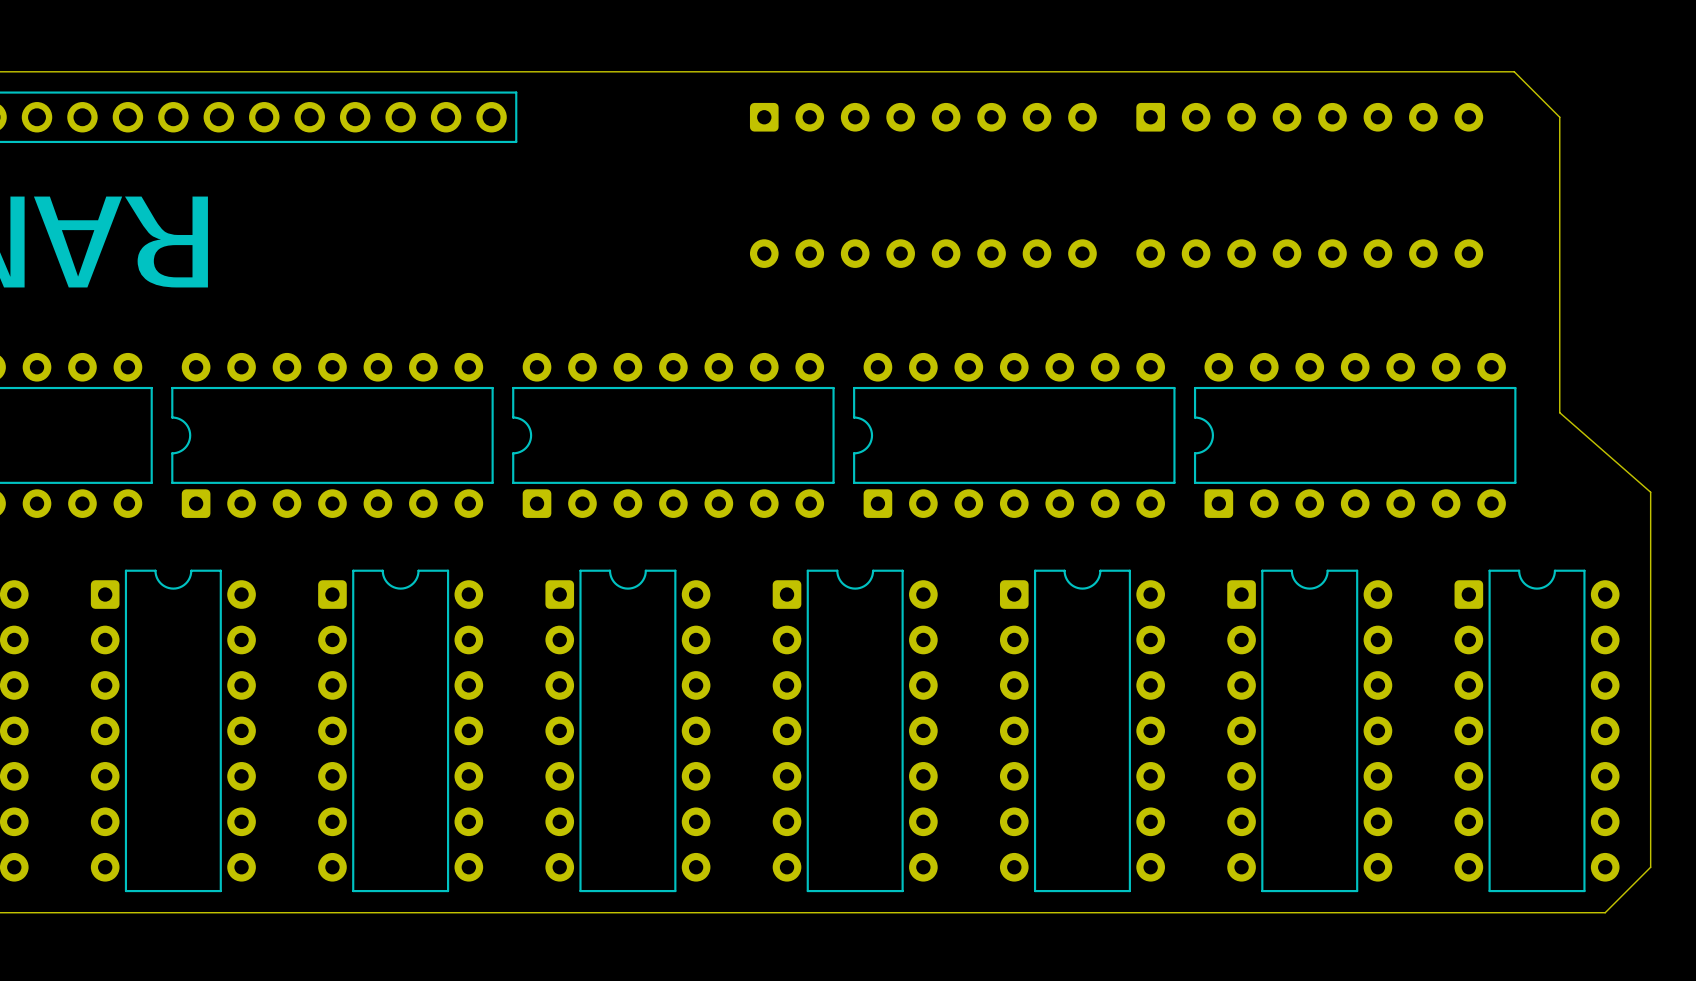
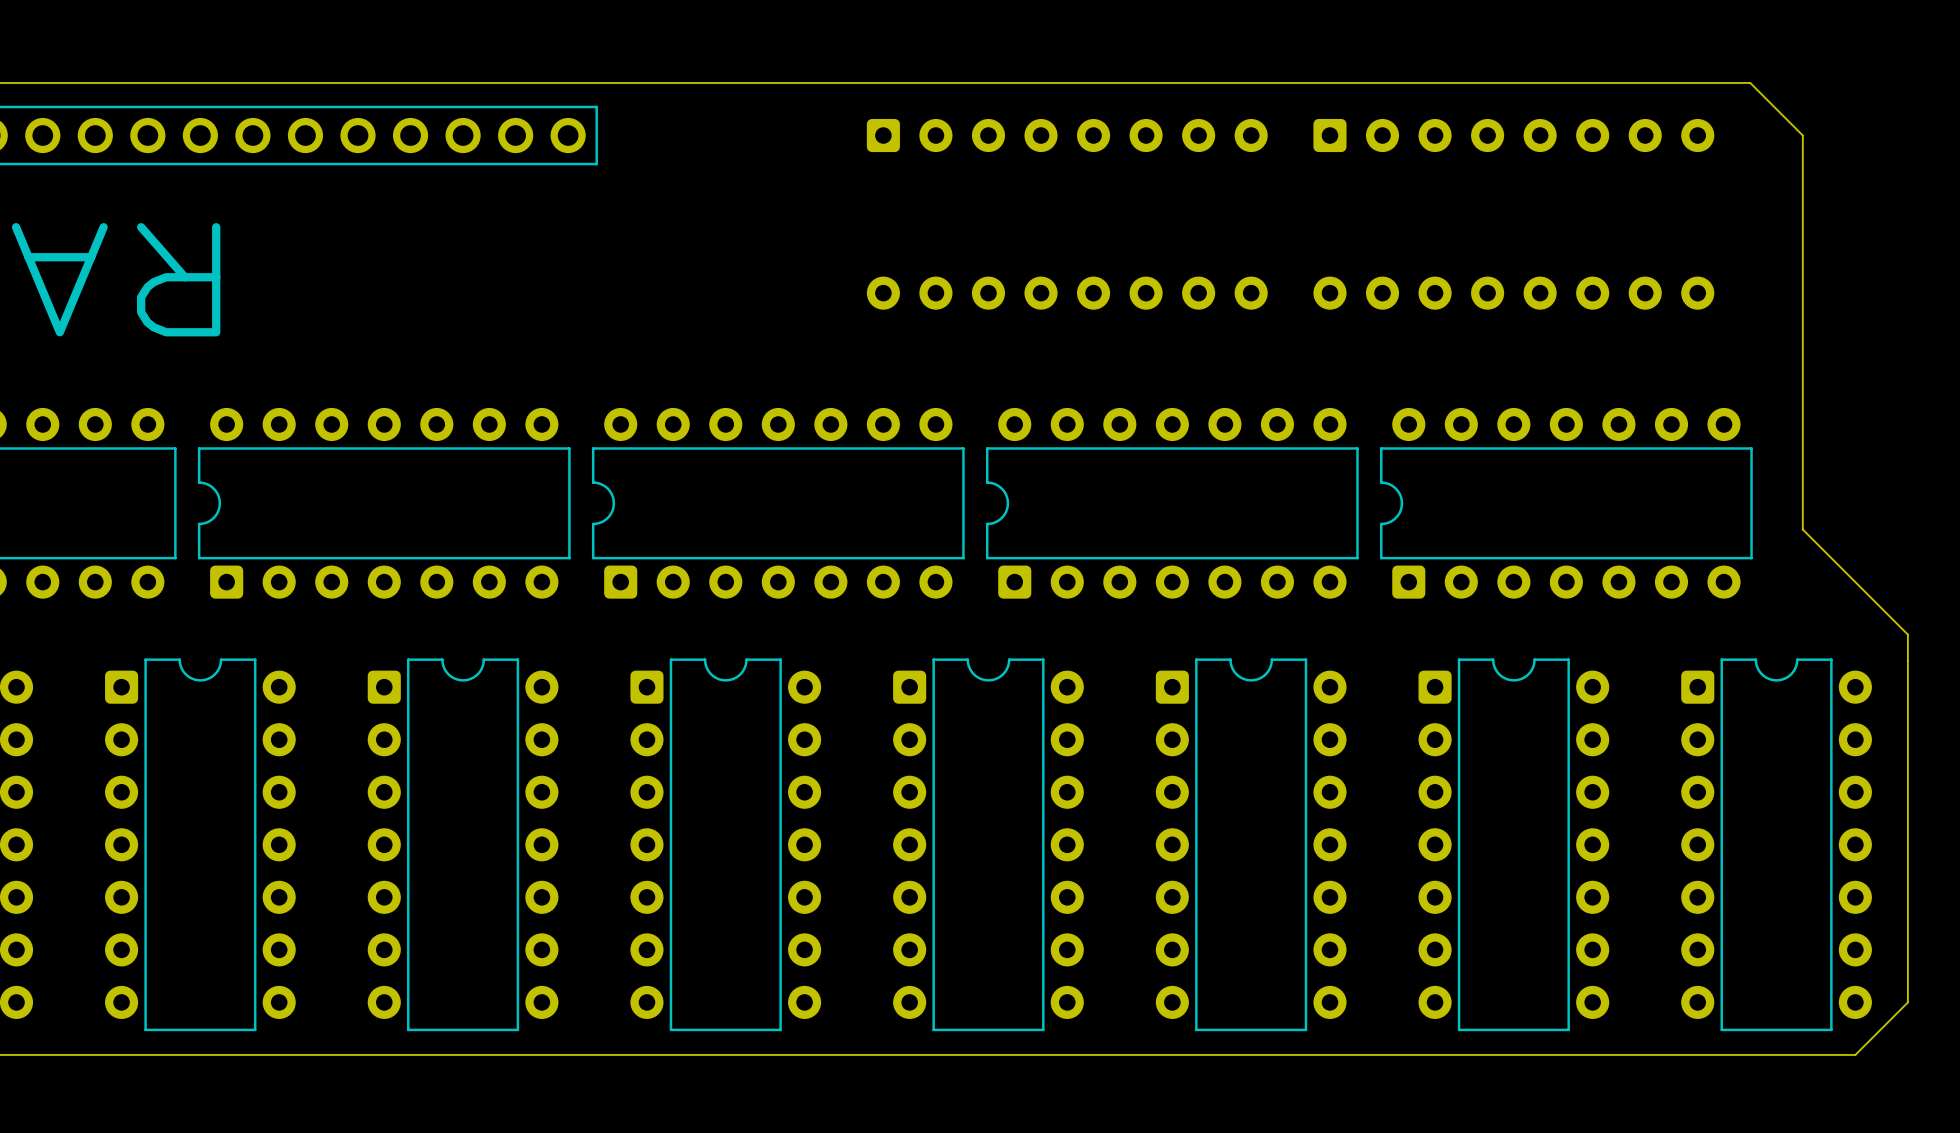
board edge: (1559, 412) (1650, 492) (1650, 549) -> (1802, 477) (1802, 529) (1907, 634)

